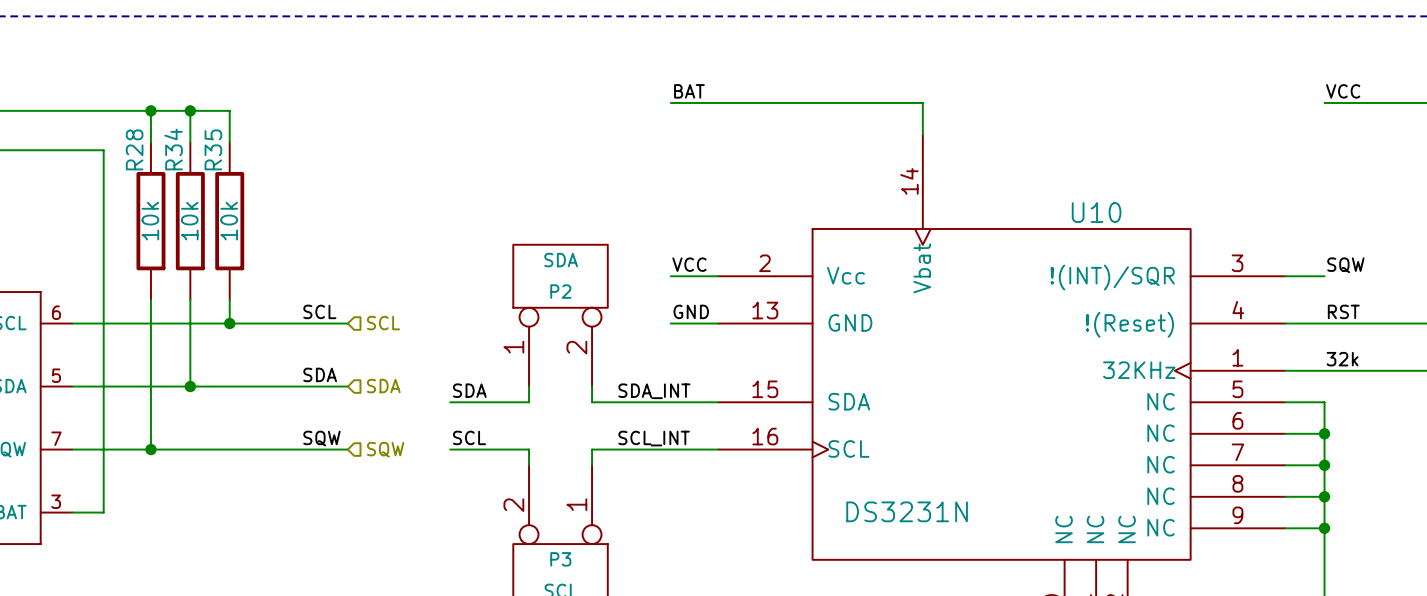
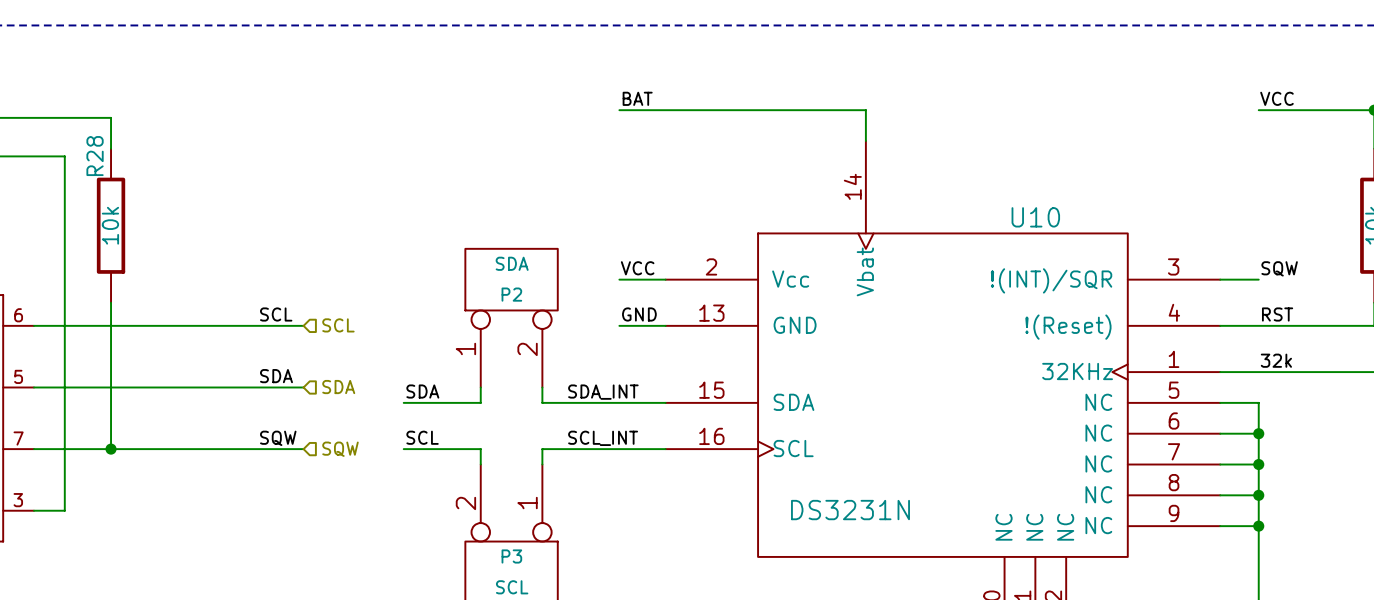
wire: (150, 110) (229, 110) (229, 142) -> none
junction: (150, 110) -> none
wire: (190, 110) (190, 142) -> none
junction: (190, 110) -> none
R34: 10k (190, 221) -> none
R35: 10k (229, 221) -> none
wire: (190, 299) (190, 386) -> none
wire: (229, 299) (229, 323) -> none
junction: (229, 323) -> none
junction: (190, 386) -> none

